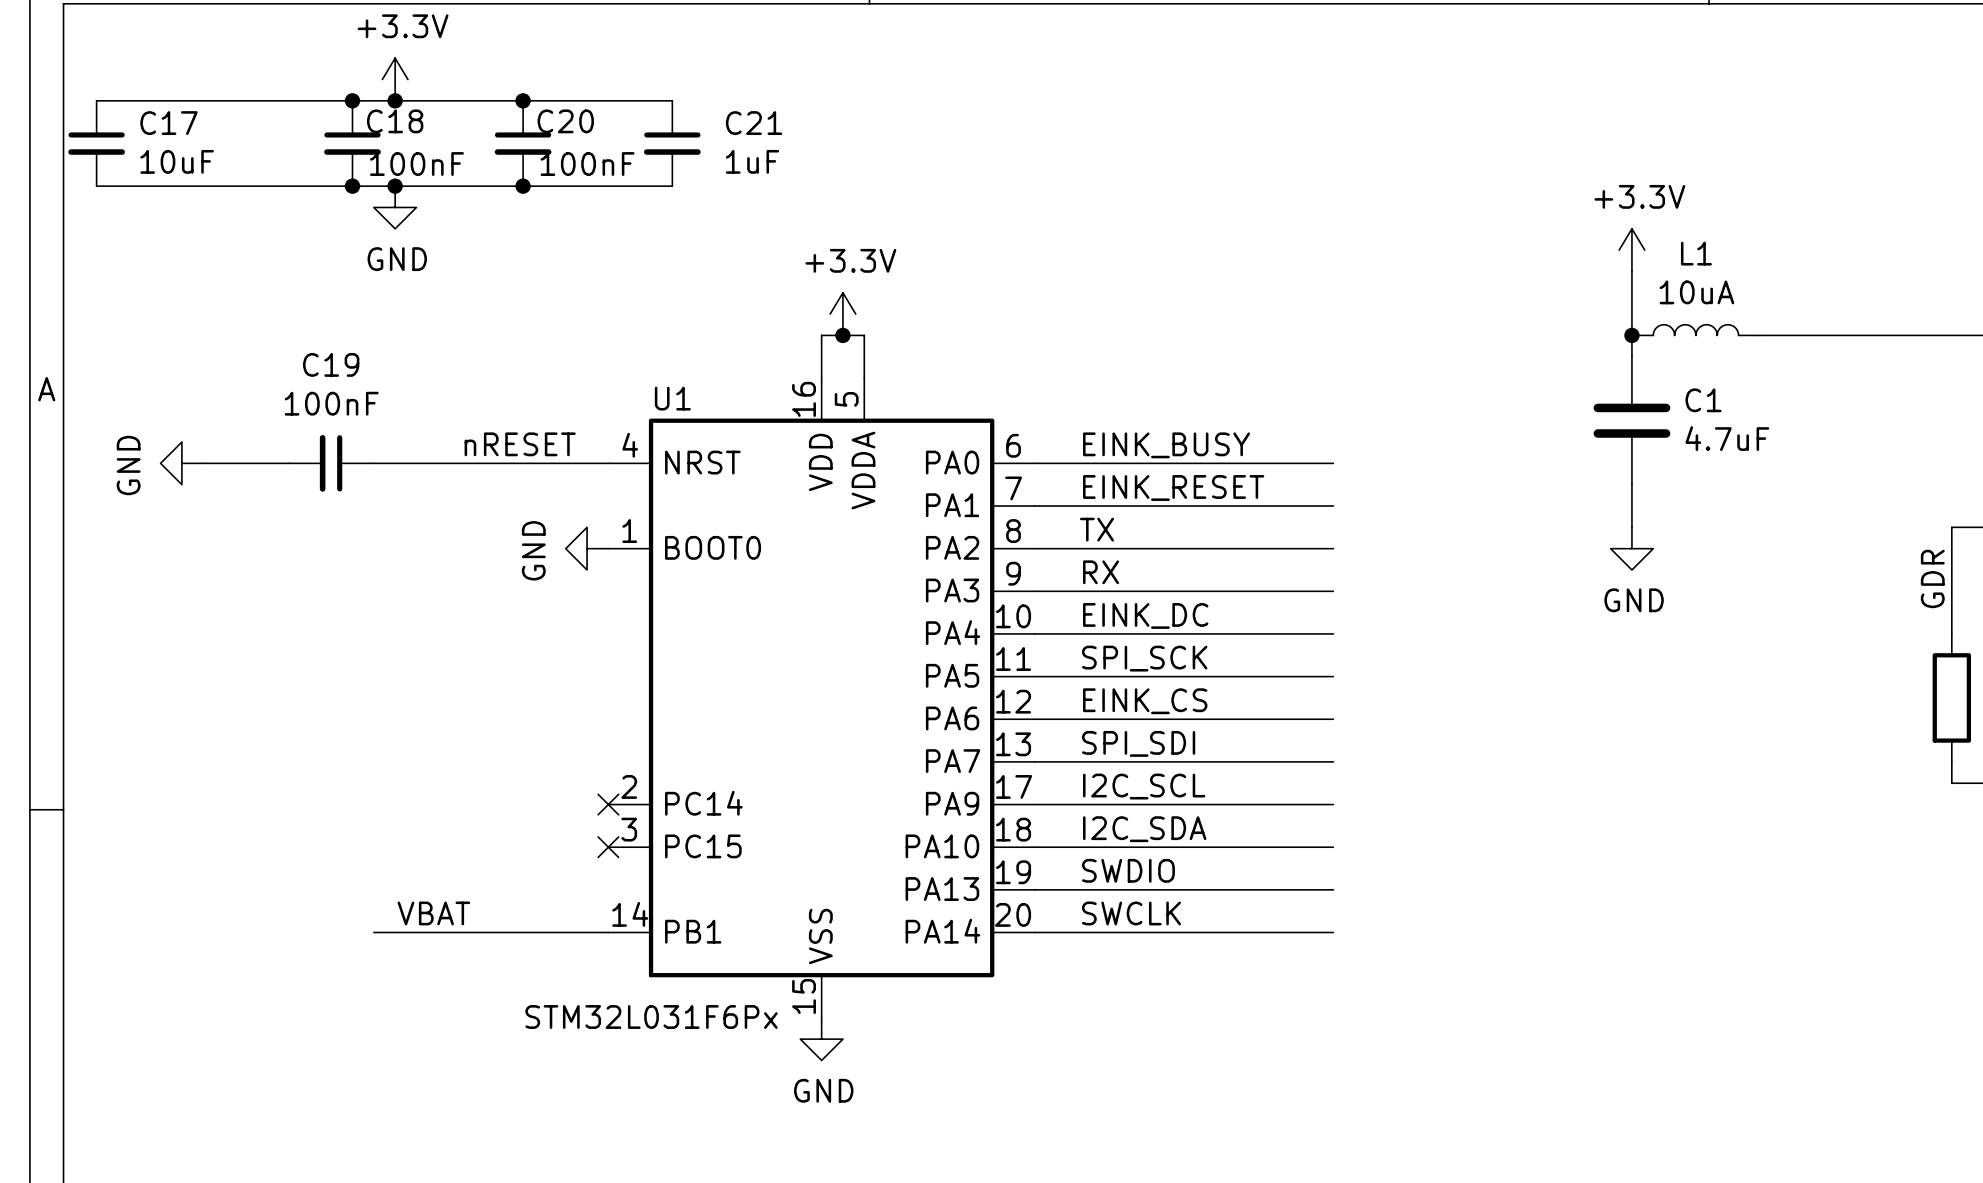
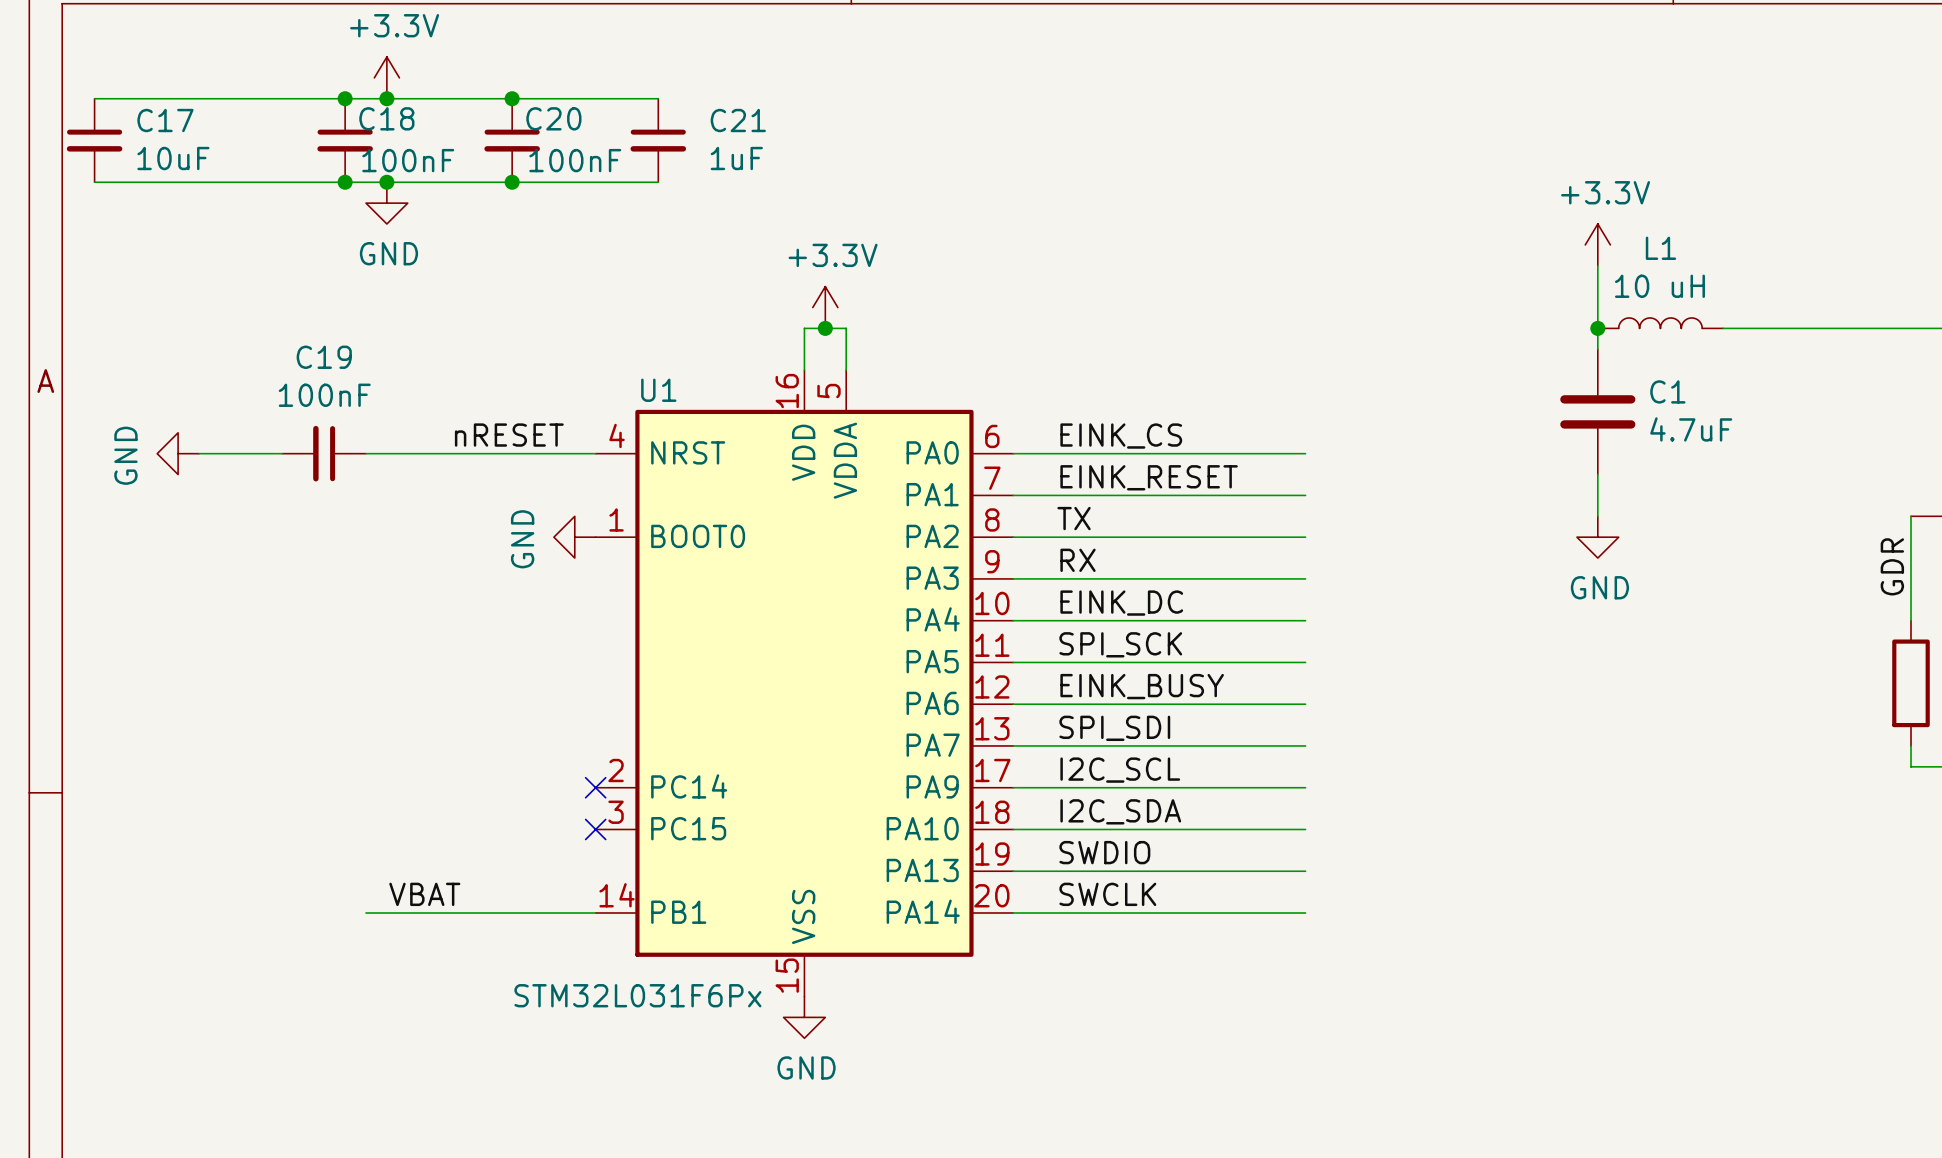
L1 value: 10uA (1696, 292) -> 10 uH (1659, 286)
label: EINK_BUSY (1166, 445) -> EINK_CS (1121, 436)
label: EINK_CS (1145, 701) -> EINK_BUSY (1142, 686)

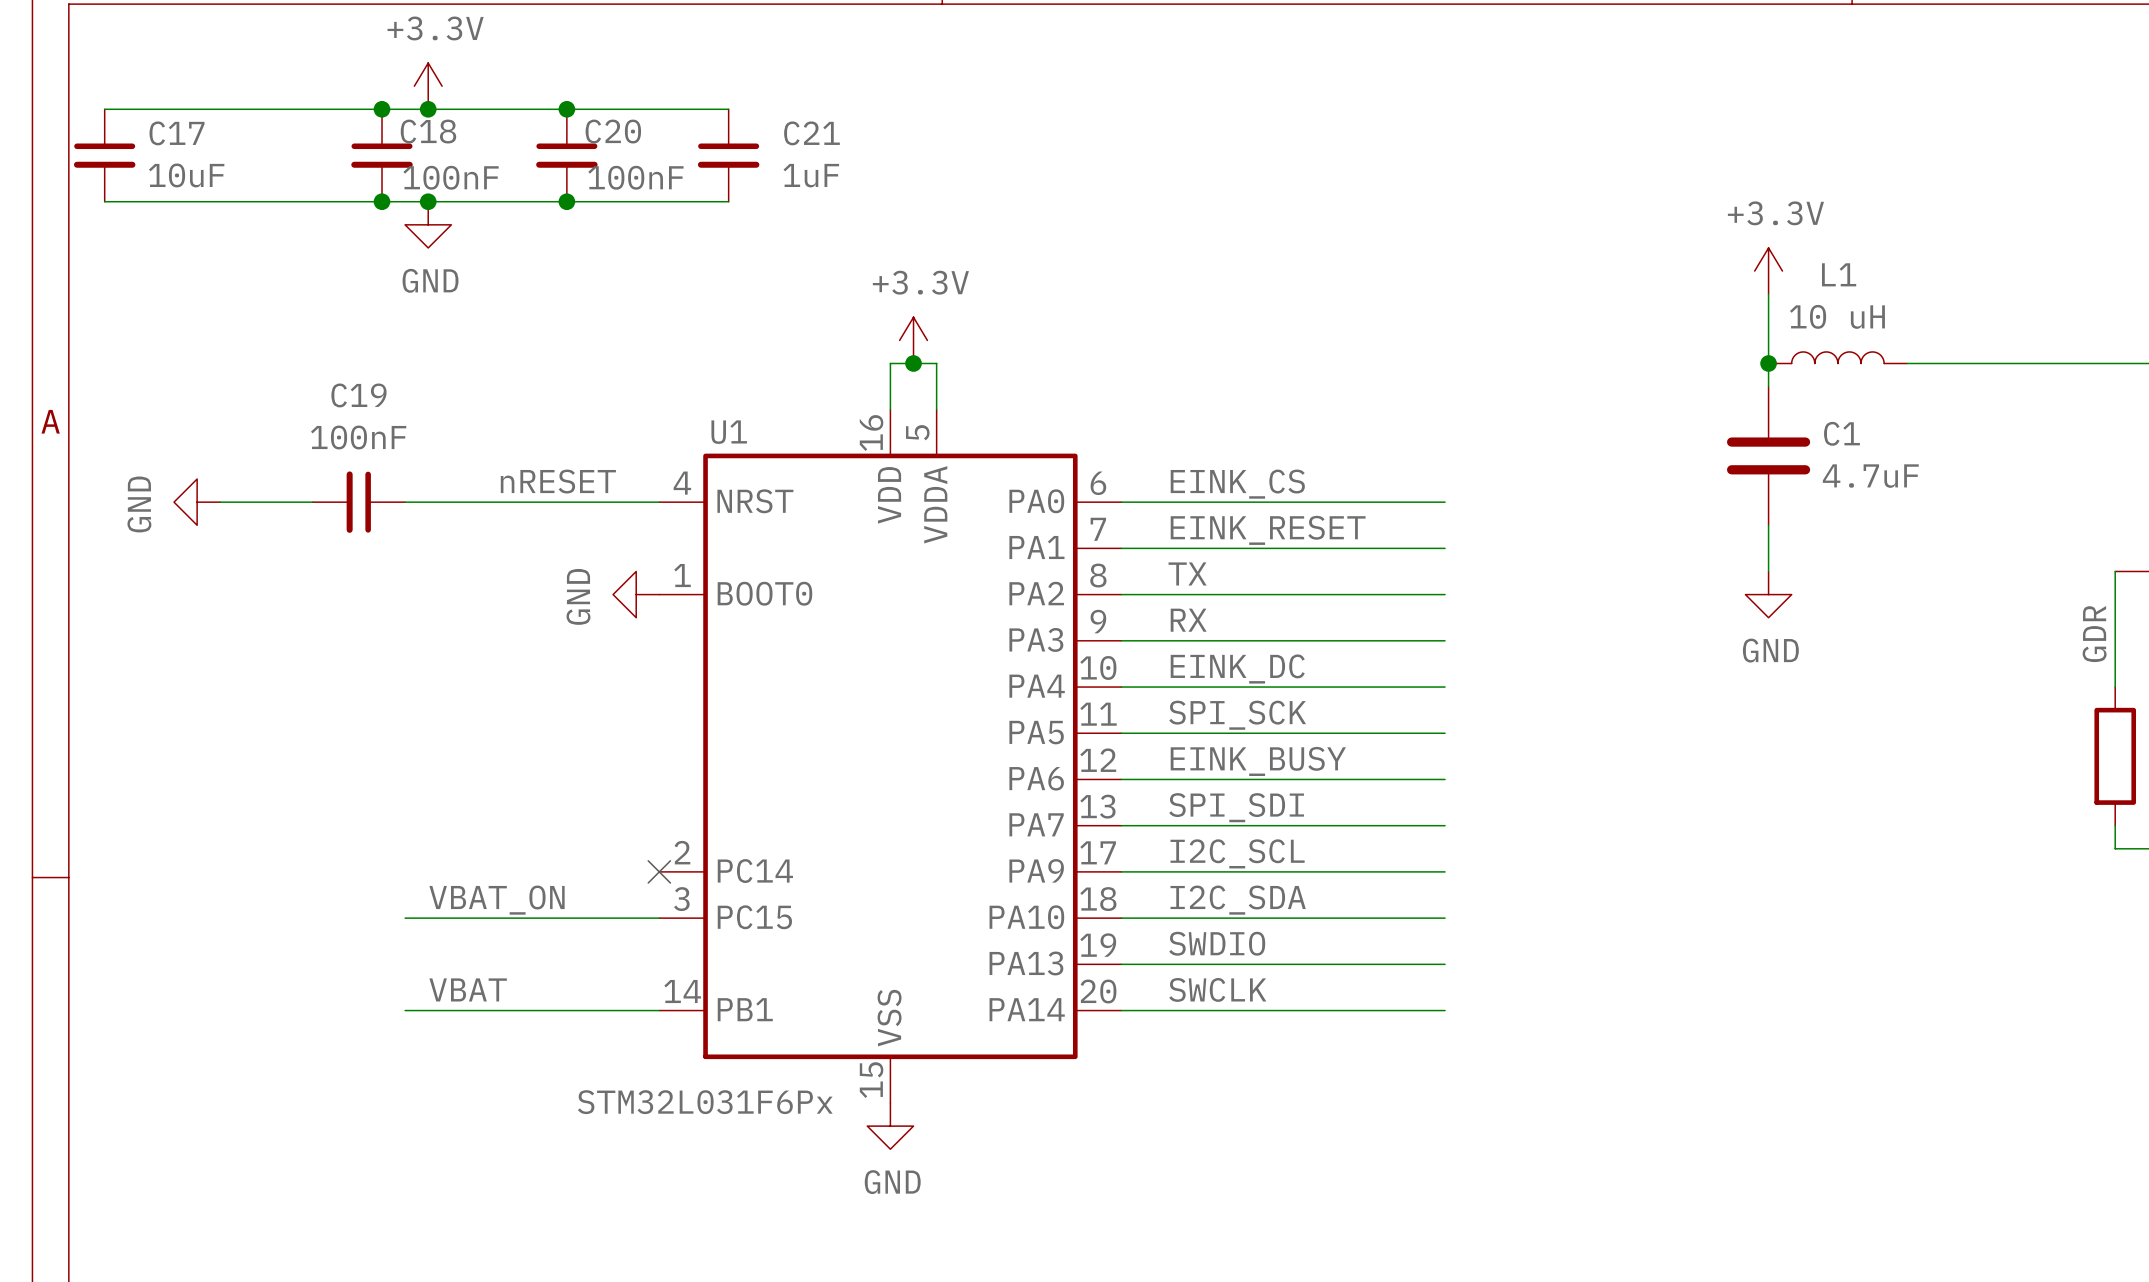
label: none -> VBAT_ON (497, 900)
wire: none -> (405, 918) (659, 918)
no-connect mark: (595, 829) -> none

